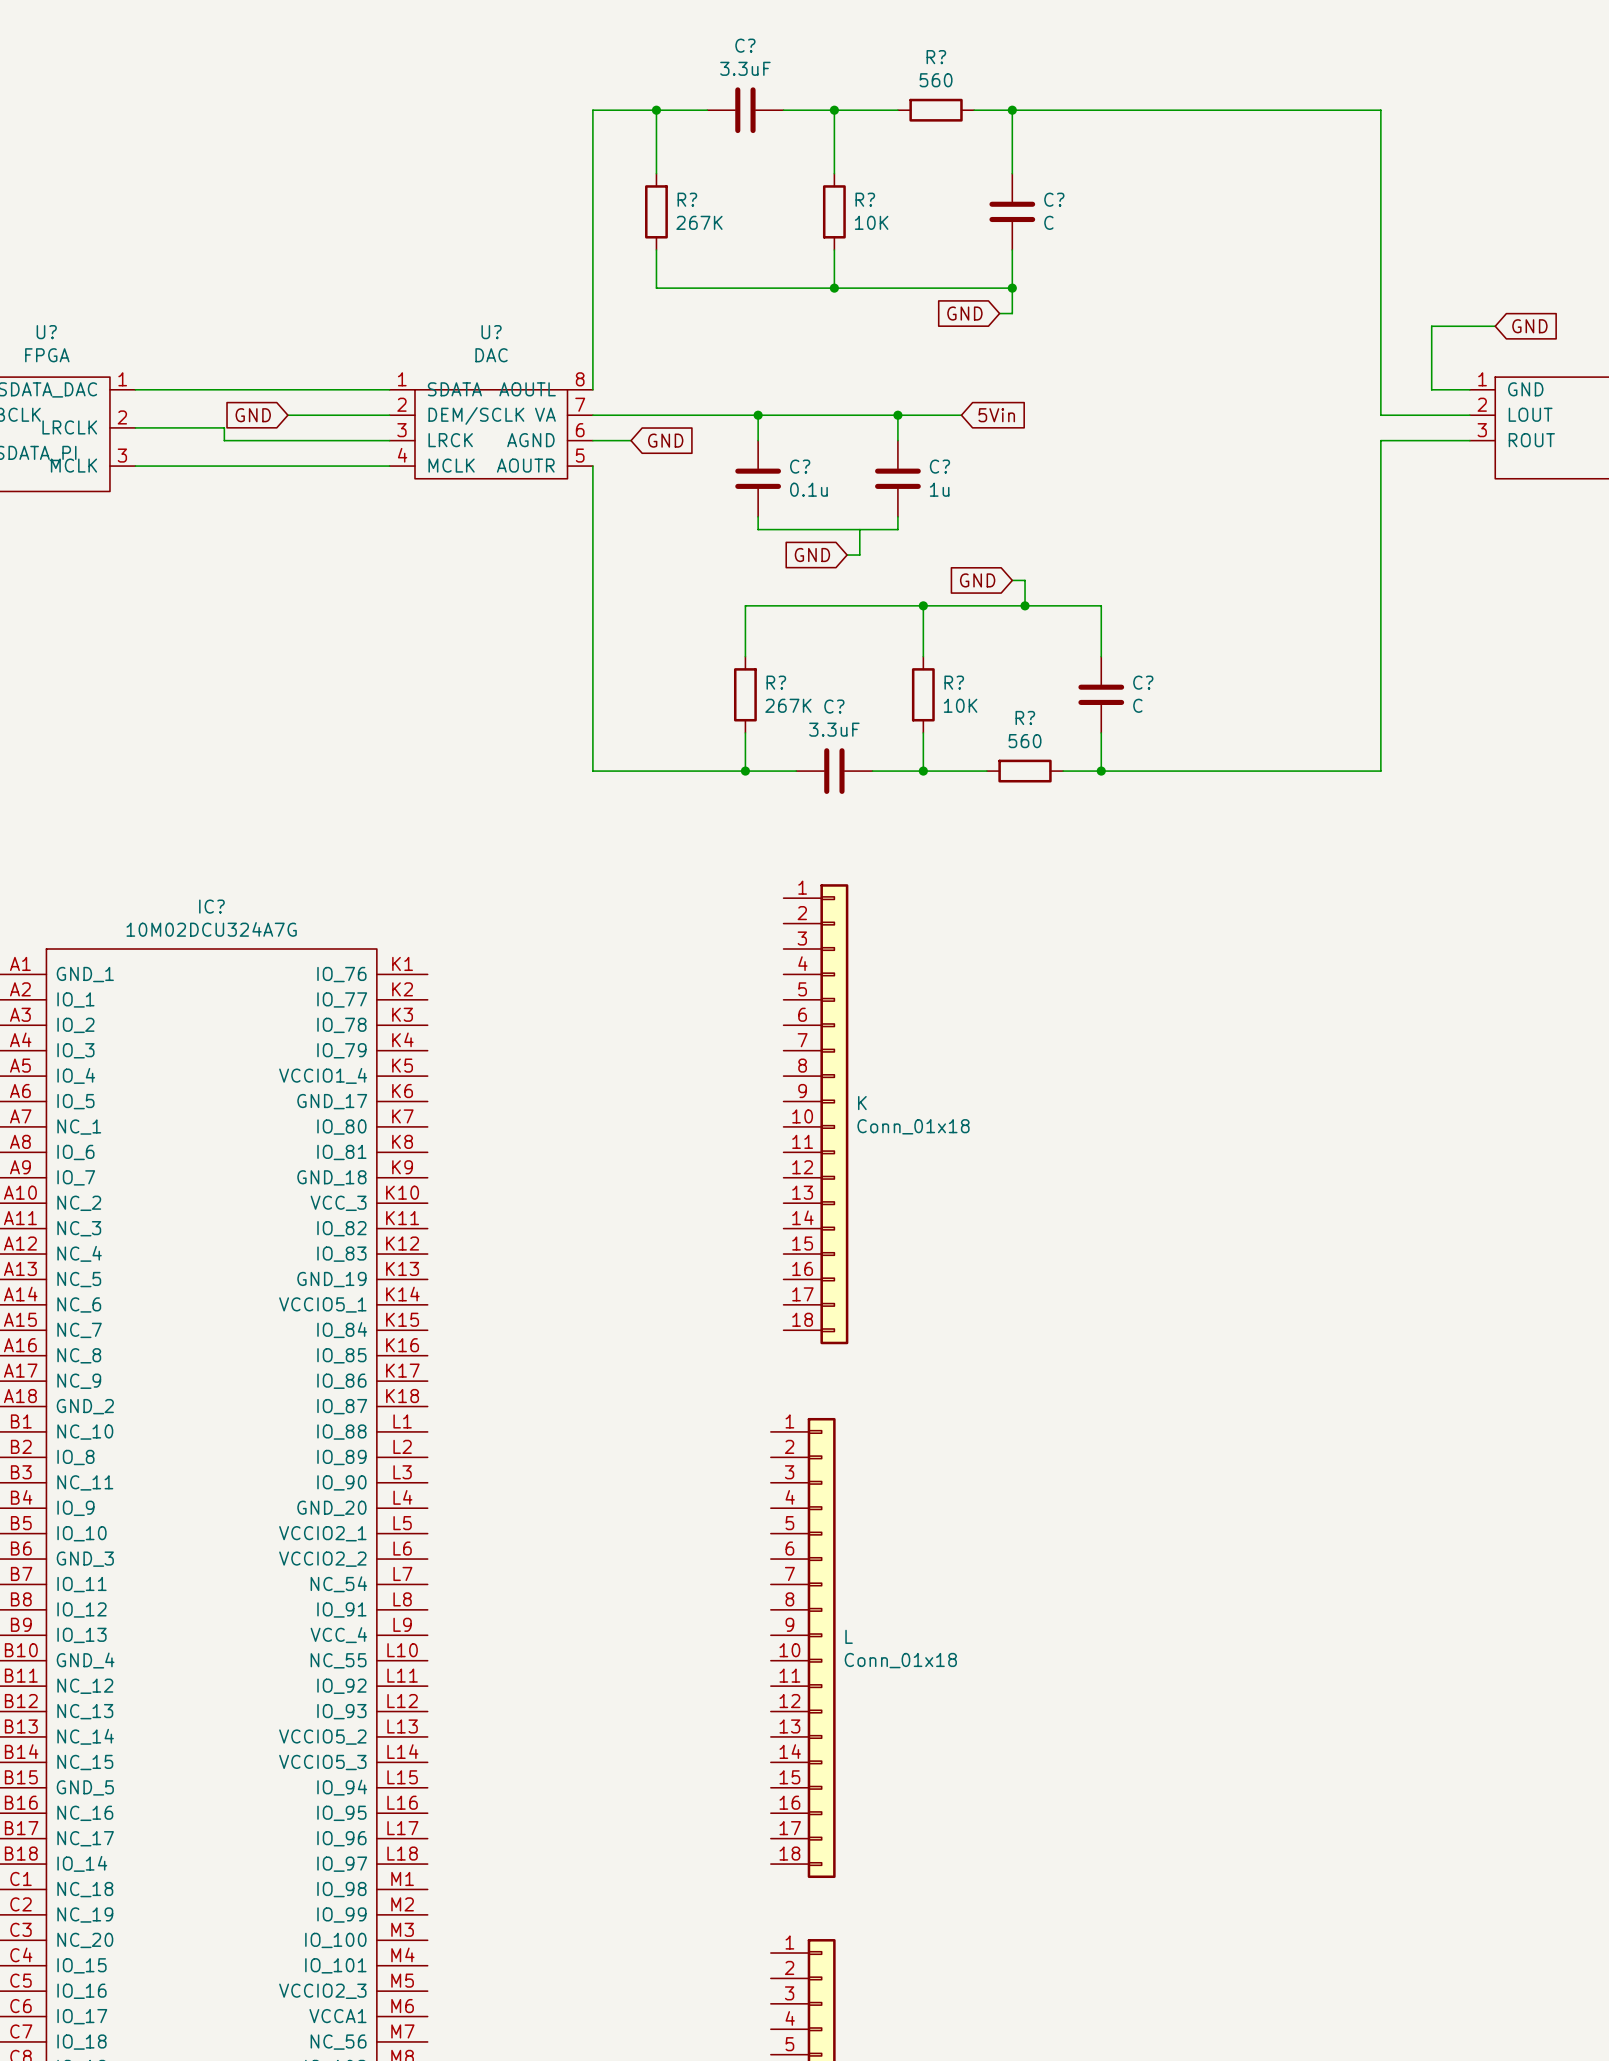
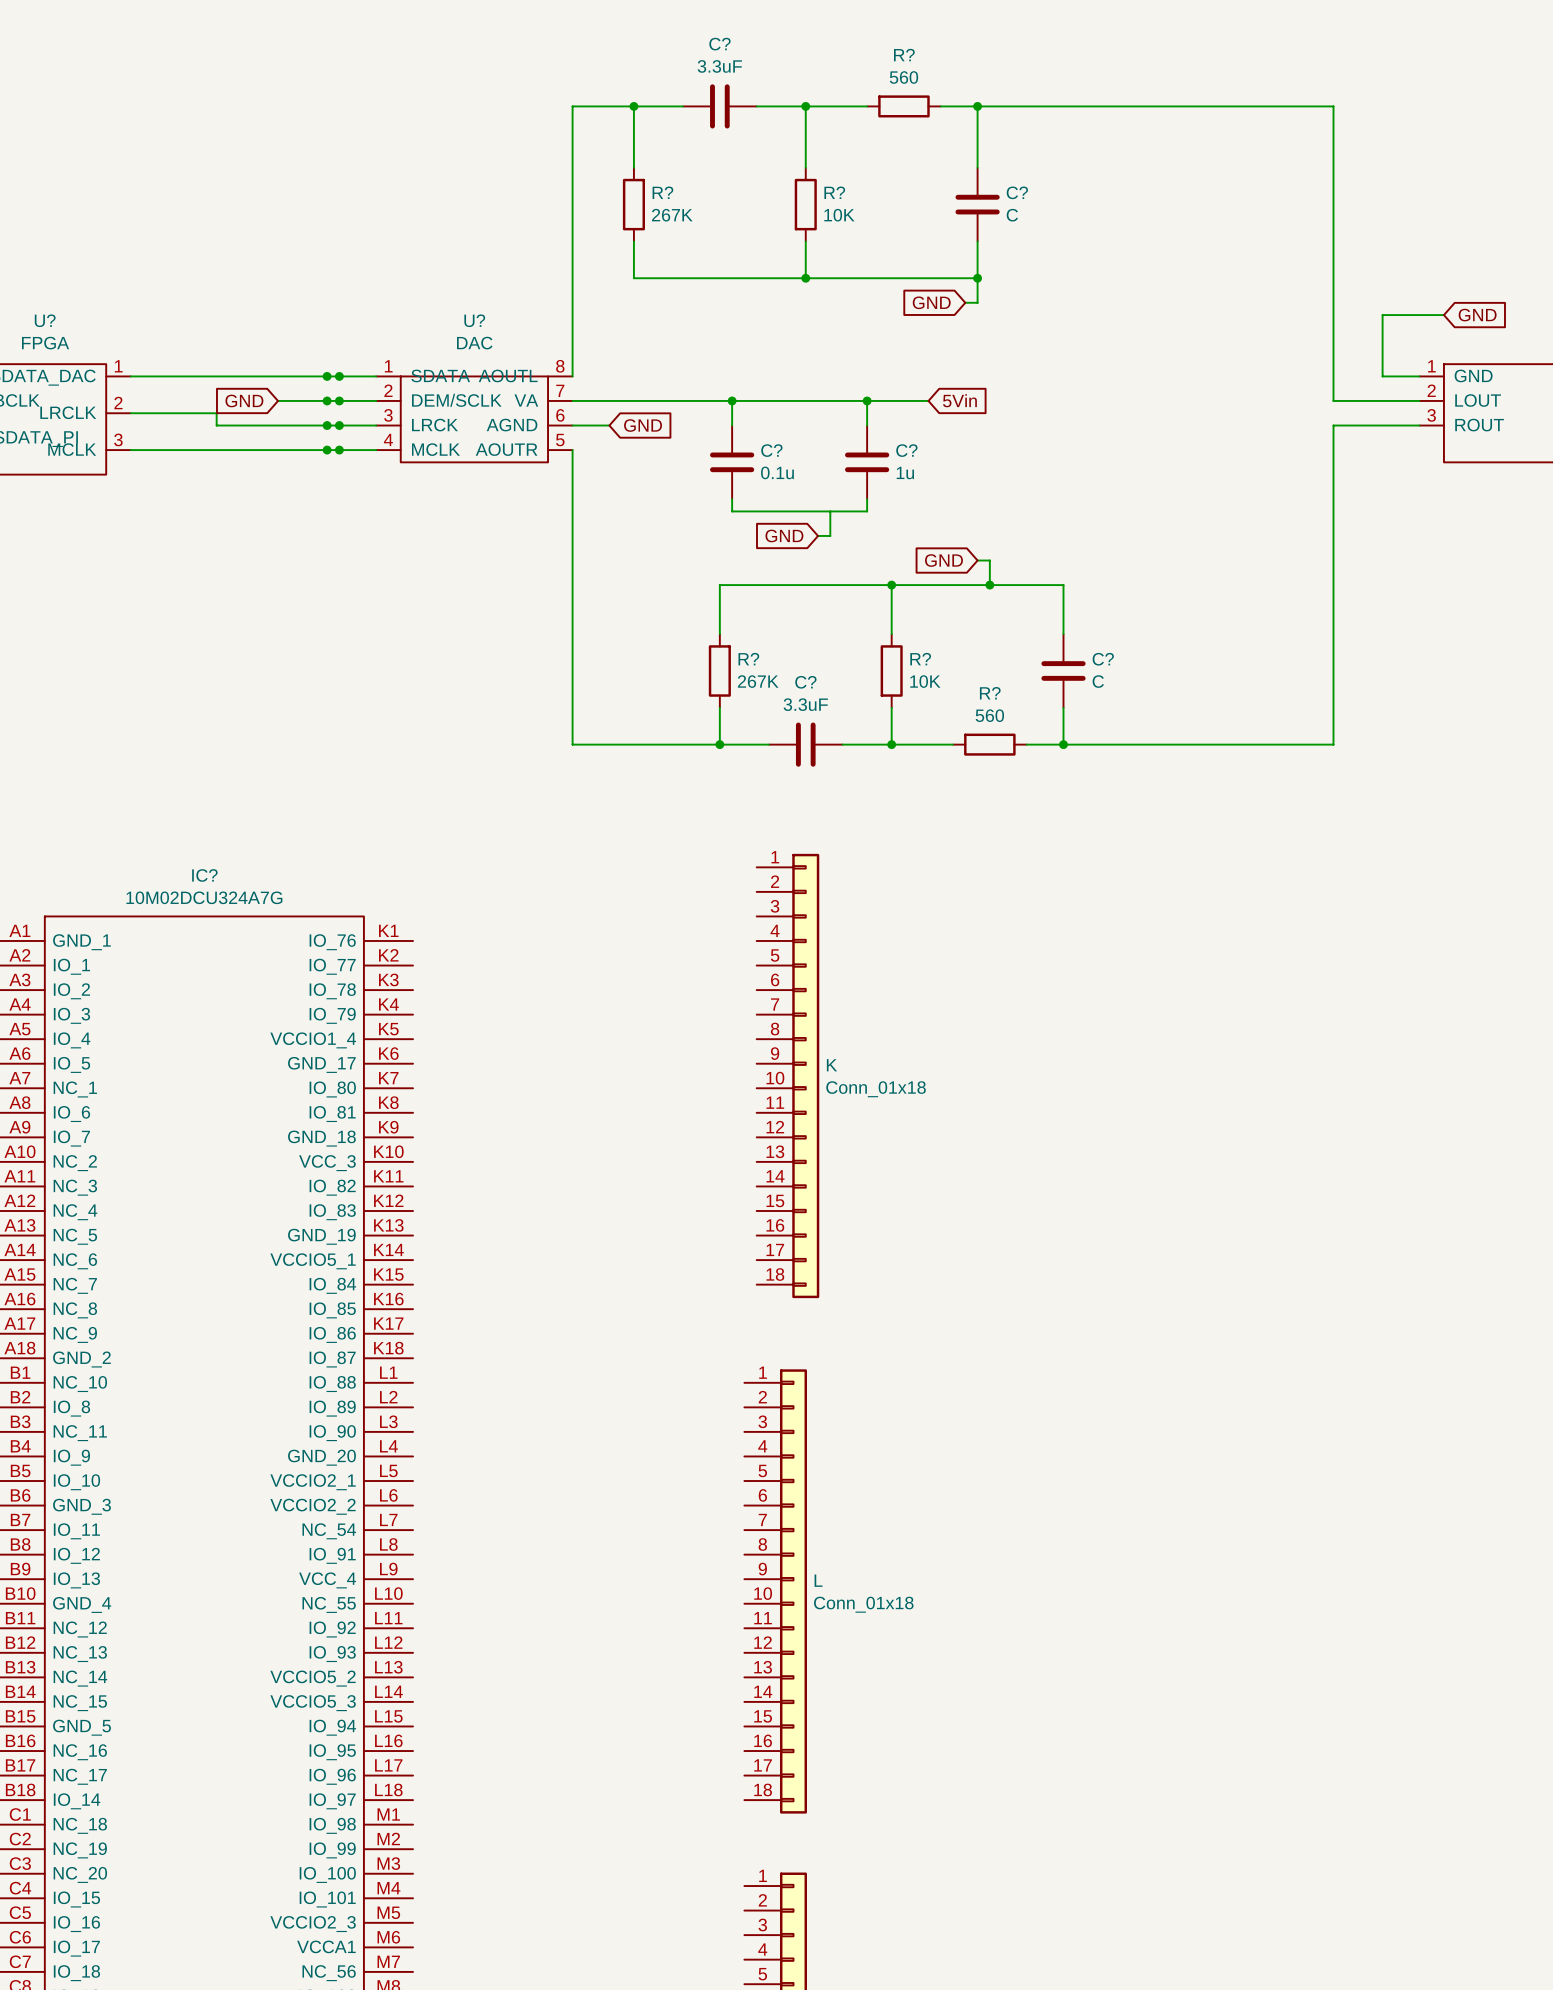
junction: none -> (327, 376)
junction: none -> (339, 376)
junction: none -> (327, 400)
junction: none -> (339, 400)
junction: none -> (327, 425)
junction: none -> (339, 425)
junction: none -> (327, 450)
junction: none -> (339, 450)

